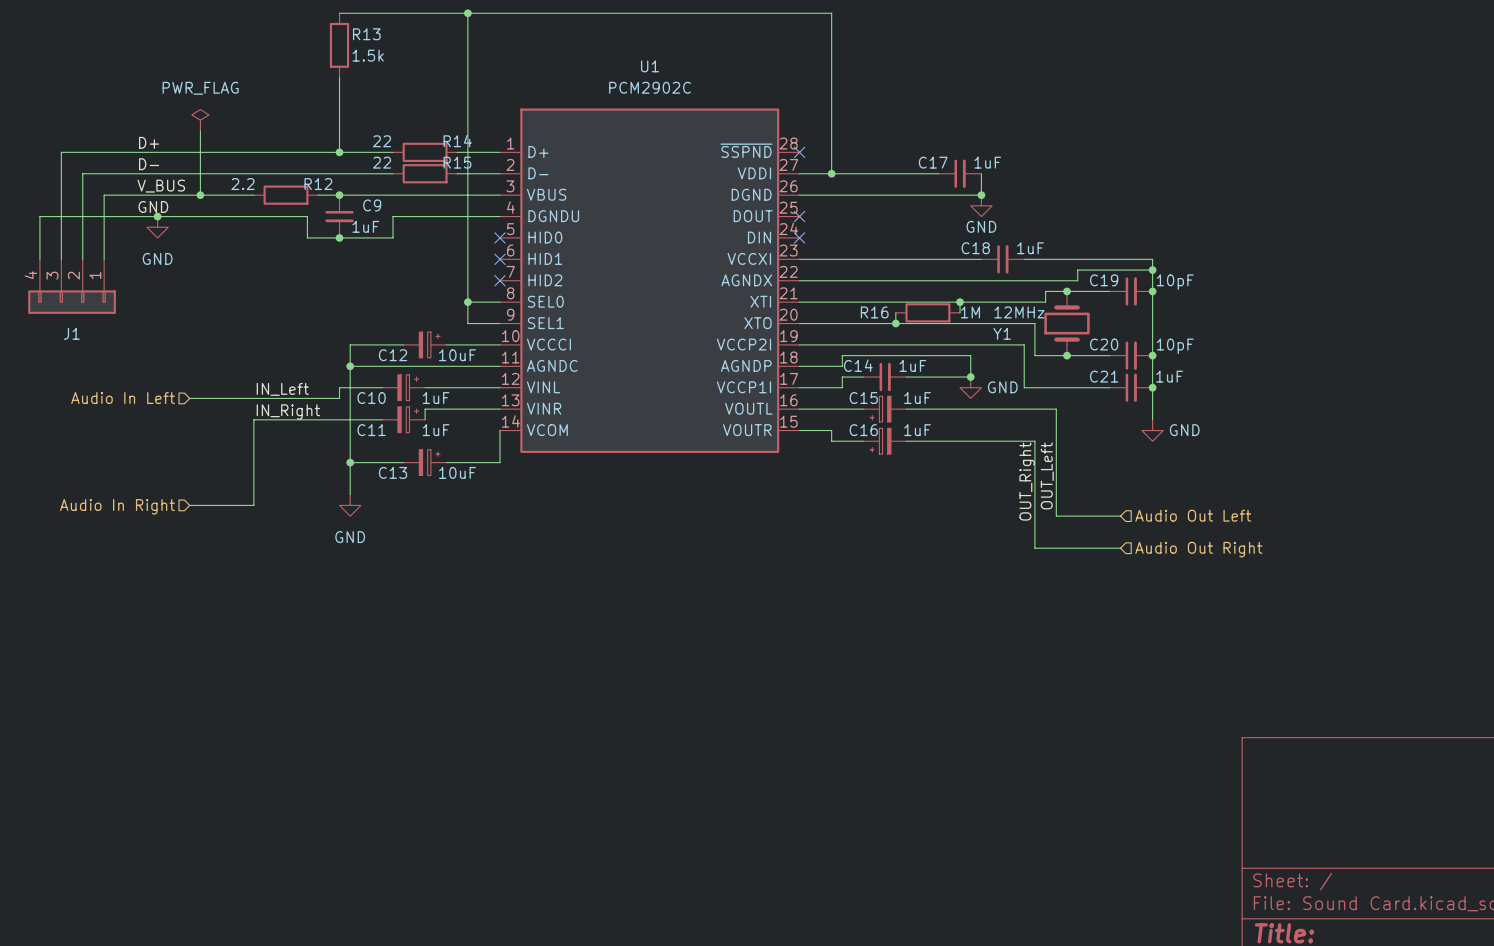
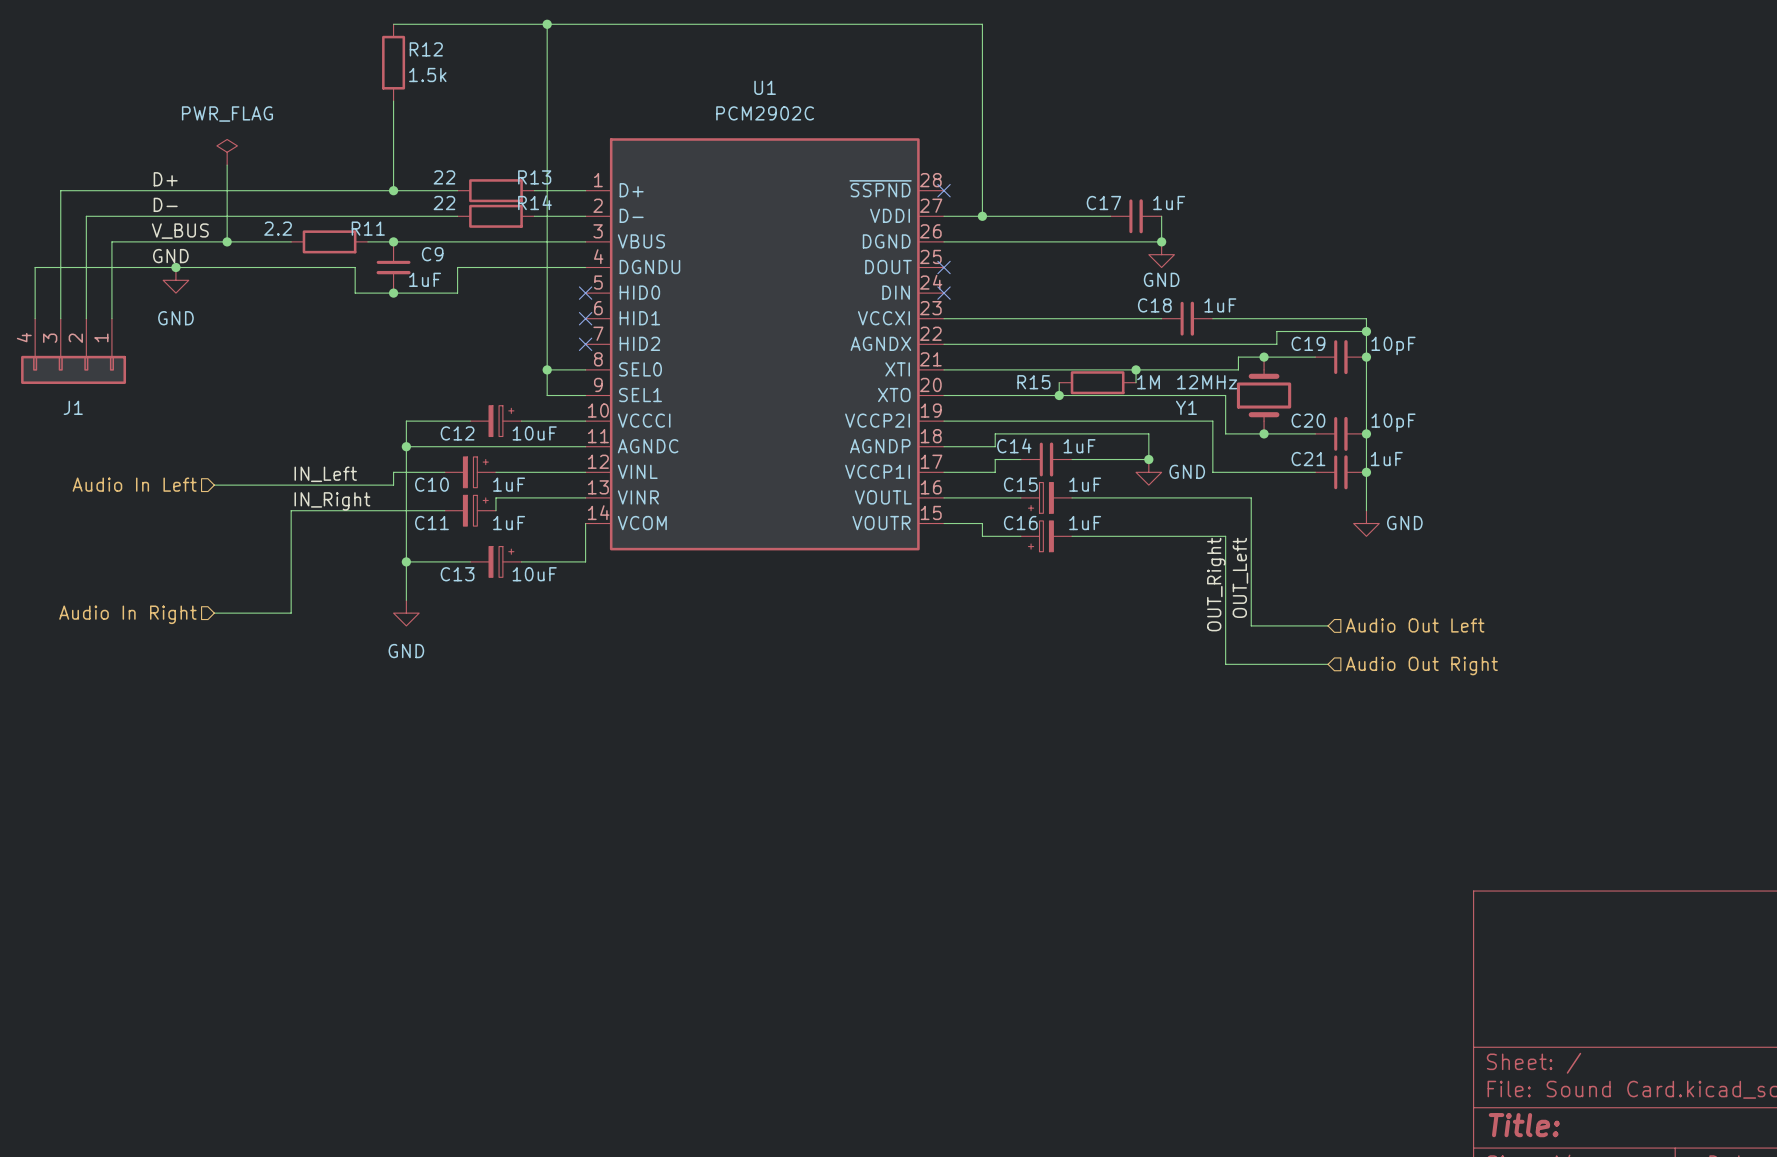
R13 name: R13 (366, 34) -> R12 (426, 49)
R14 name: R14 (457, 141) -> R13 (534, 177)
R15 name: R15 (457, 162) -> R14 (534, 202)
R12 name: R12 (318, 184) -> R11 (368, 228)
R16 name: R16 (874, 312) -> R15 (1033, 382)

